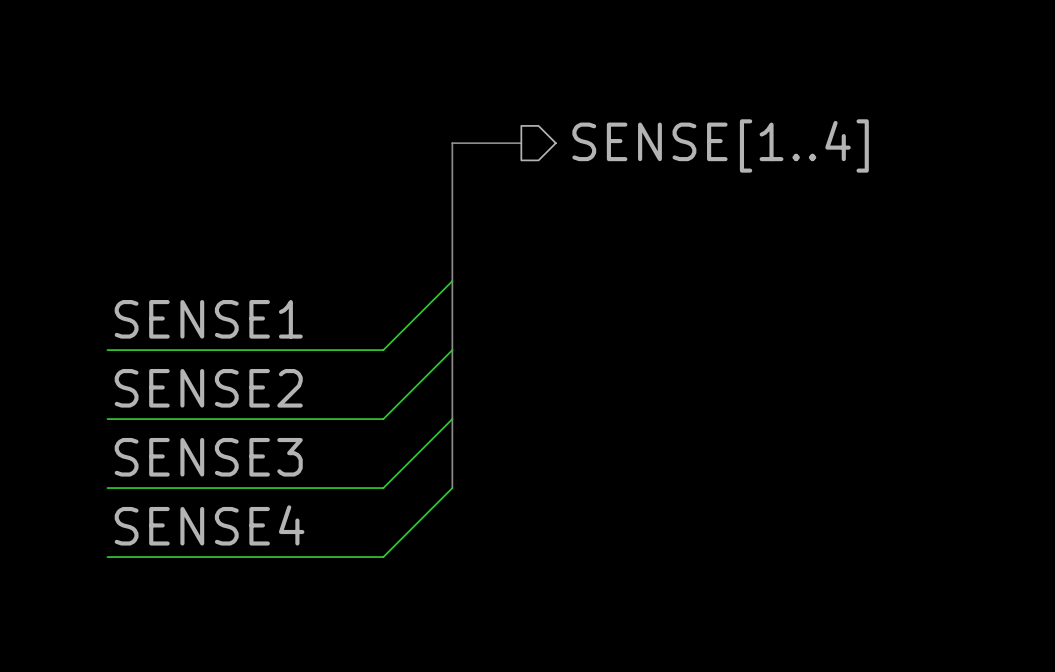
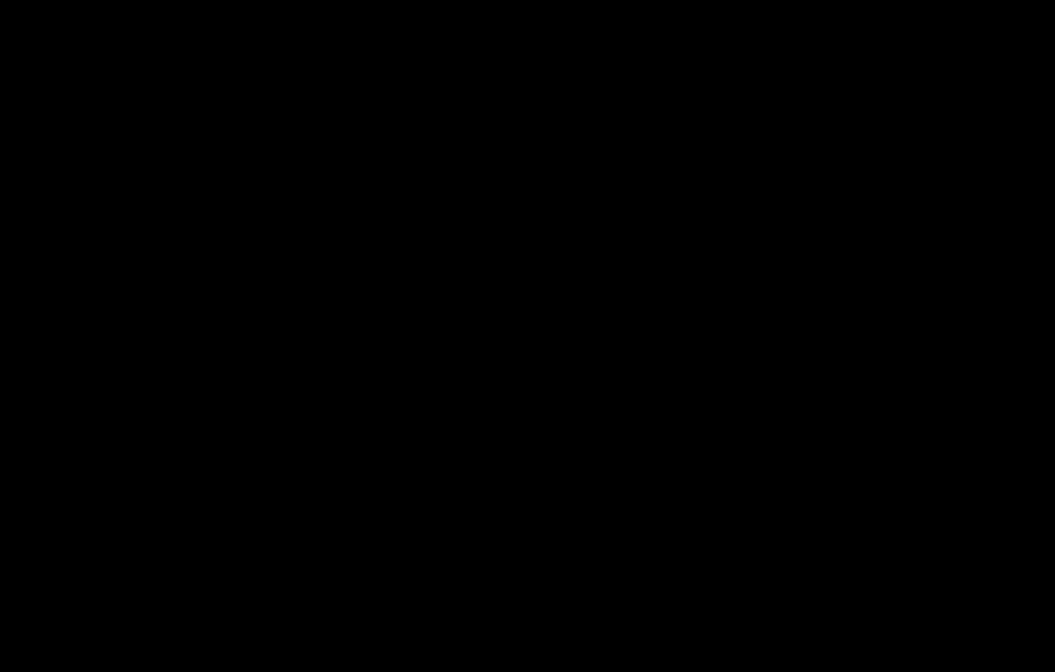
bus: (521, 143) (452, 143) (452, 488) -> none
hierarchical label: SENSE[1..4] (720, 145) -> none
wire: (452, 281) (383, 350) (107, 350) -> none
label: SENSE1 (208, 319) -> none
wire: (452, 350) (383, 419) (107, 419) -> none
label: SENSE2 (208, 388) -> none
wire: (452, 419) (383, 488) (107, 488) -> none
label: SENSE3 (208, 457) -> none
wire: (452, 488) (383, 557) (107, 557) -> none
label: SENSE4 (209, 525) -> none

